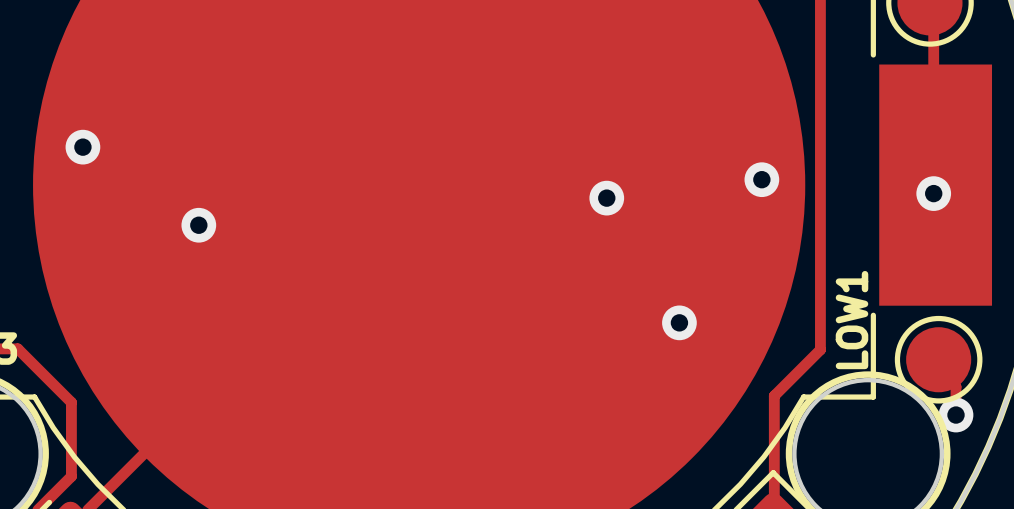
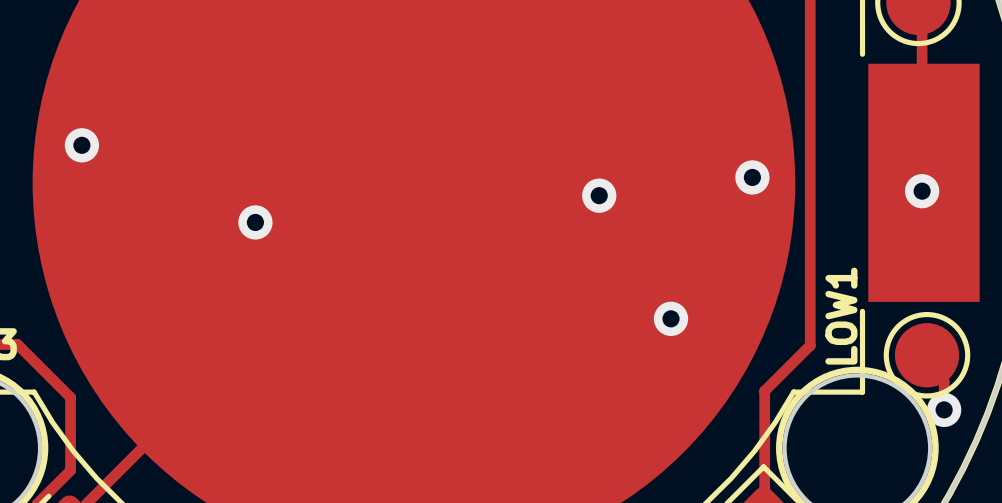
via position: (198, 225) -> (255, 222)

